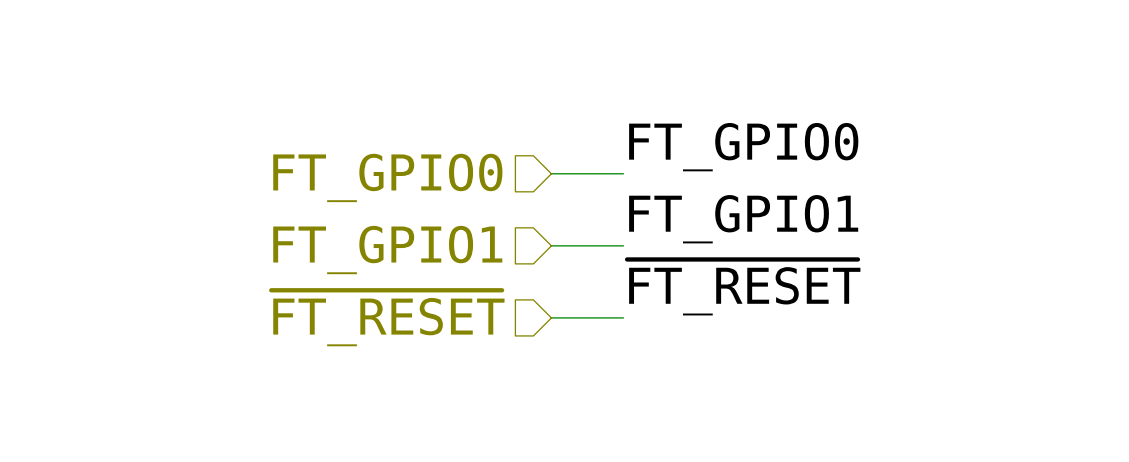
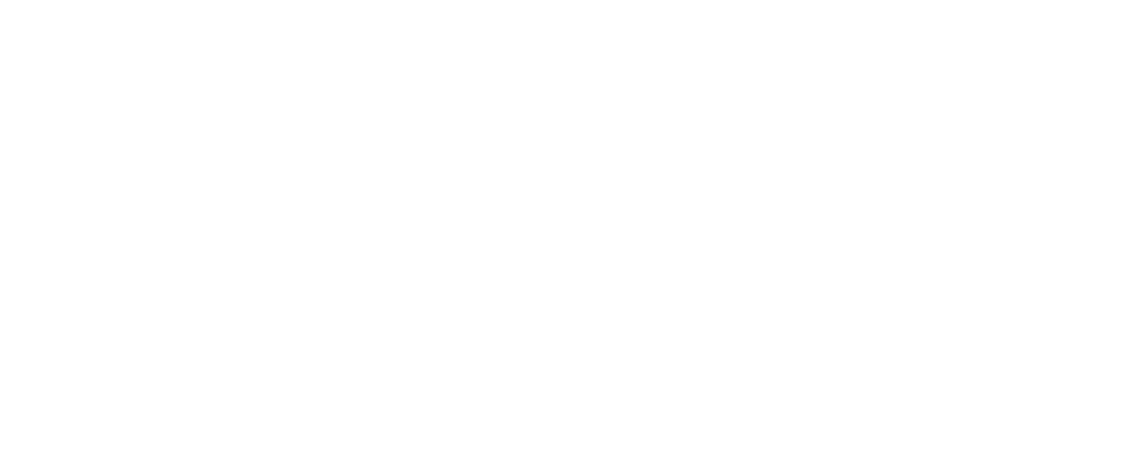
label: FT_GPIO0 (743, 147) -> none
wire: (551, 173) (623, 173) -> none
hierarchical label: FT_GPIO0 (387, 177) -> none
label: FT_GPIO1 (743, 219) -> none
wire: (551, 245) (623, 245) -> none
hierarchical label: FT_GPIO1 (387, 250) -> none
label: ~{FT_RESET} (743, 287) -> none
wire: (551, 317) (623, 317) -> none
hierarchical label: ~{FT_RESET} (387, 318) -> none

